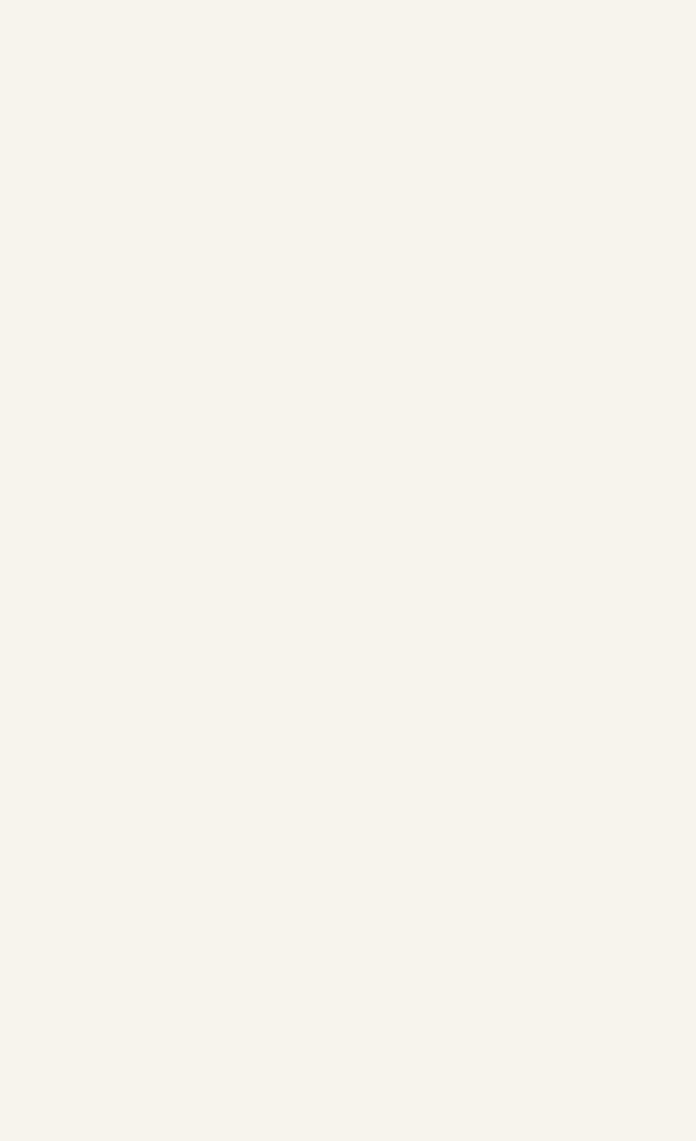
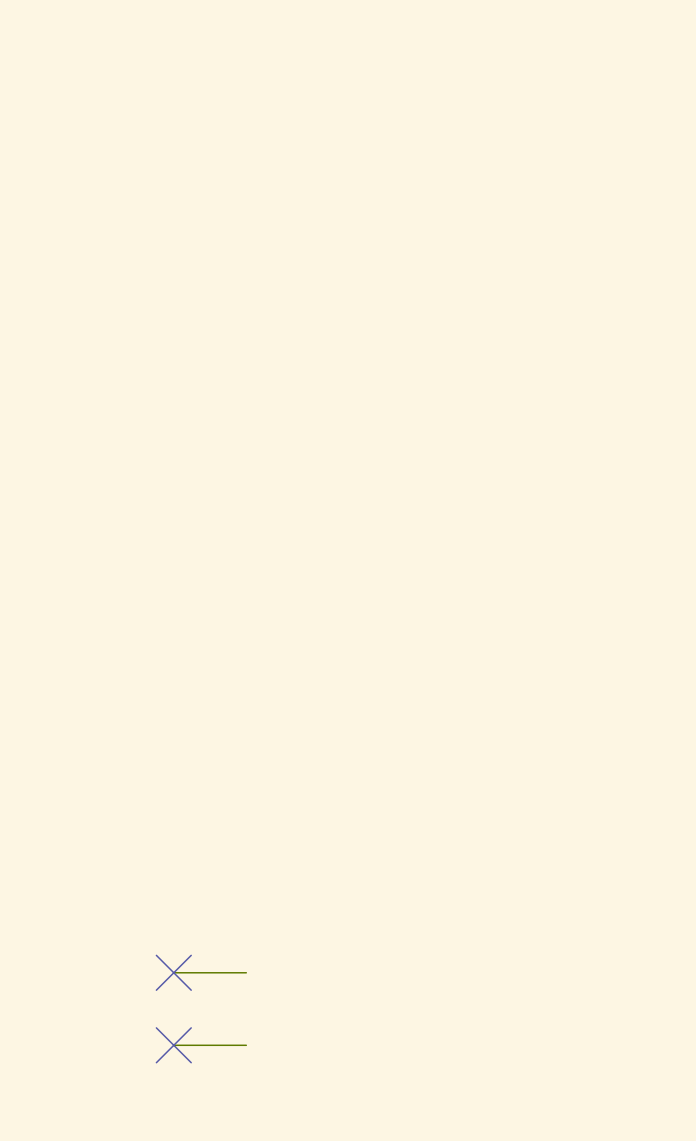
wire: none -> (173, 972) (246, 972)
no-connect mark: none -> (173, 972)
wire: none -> (173, 1045) (246, 1045)
no-connect mark: none -> (173, 1045)

